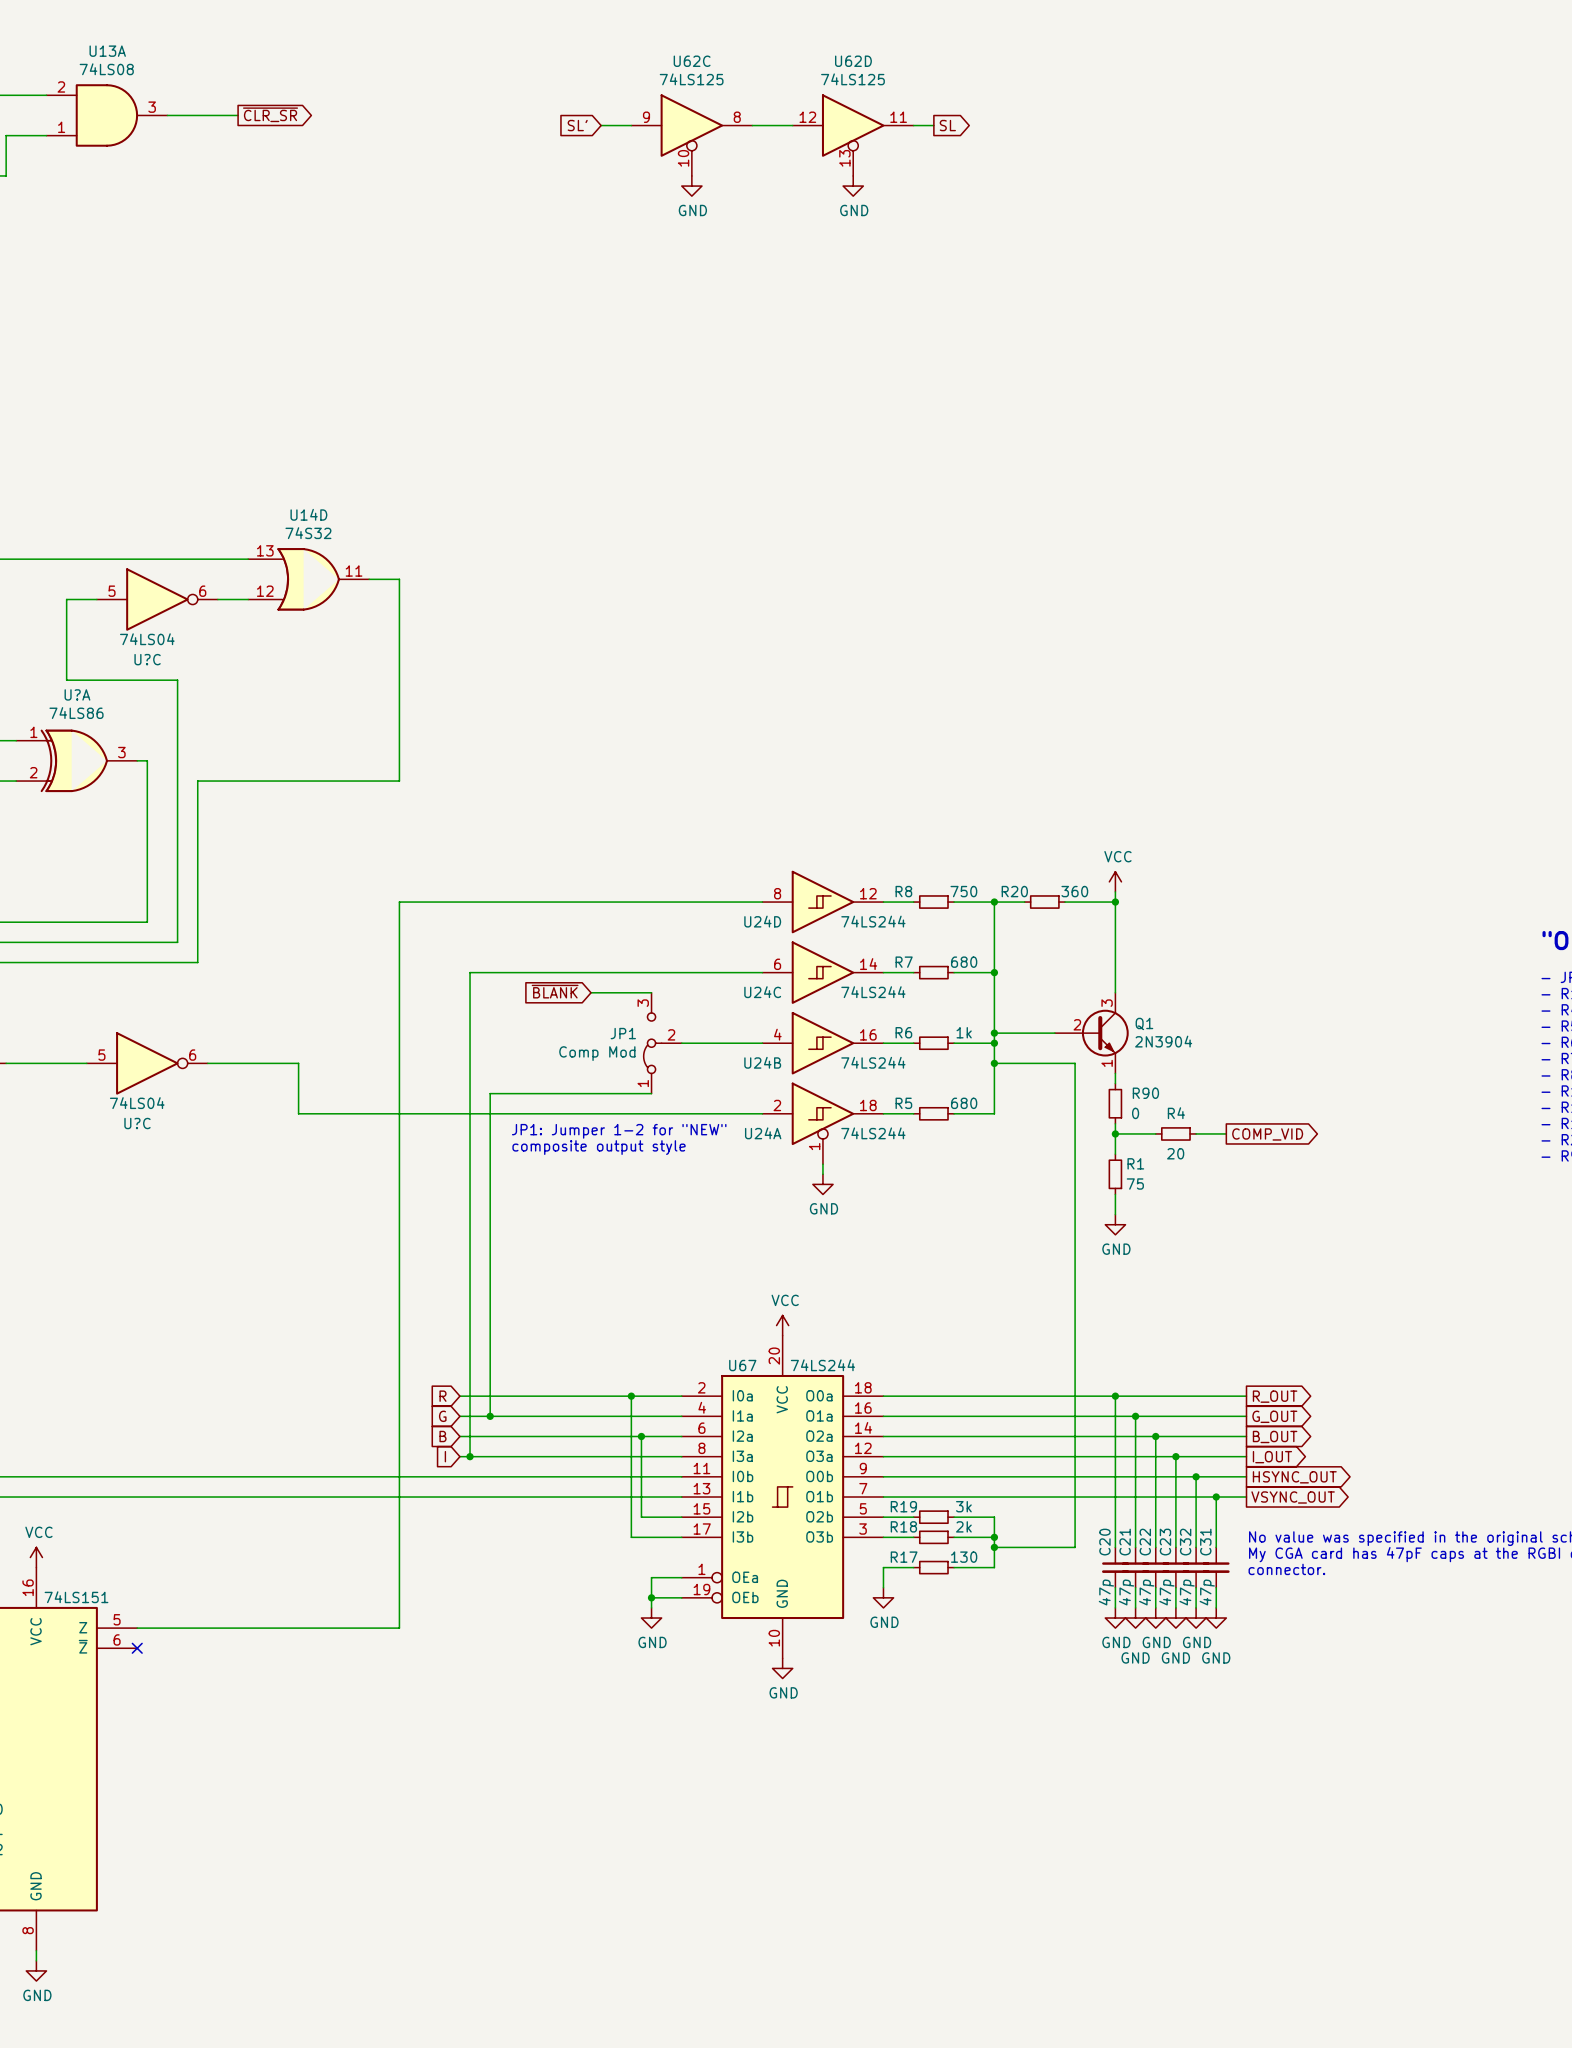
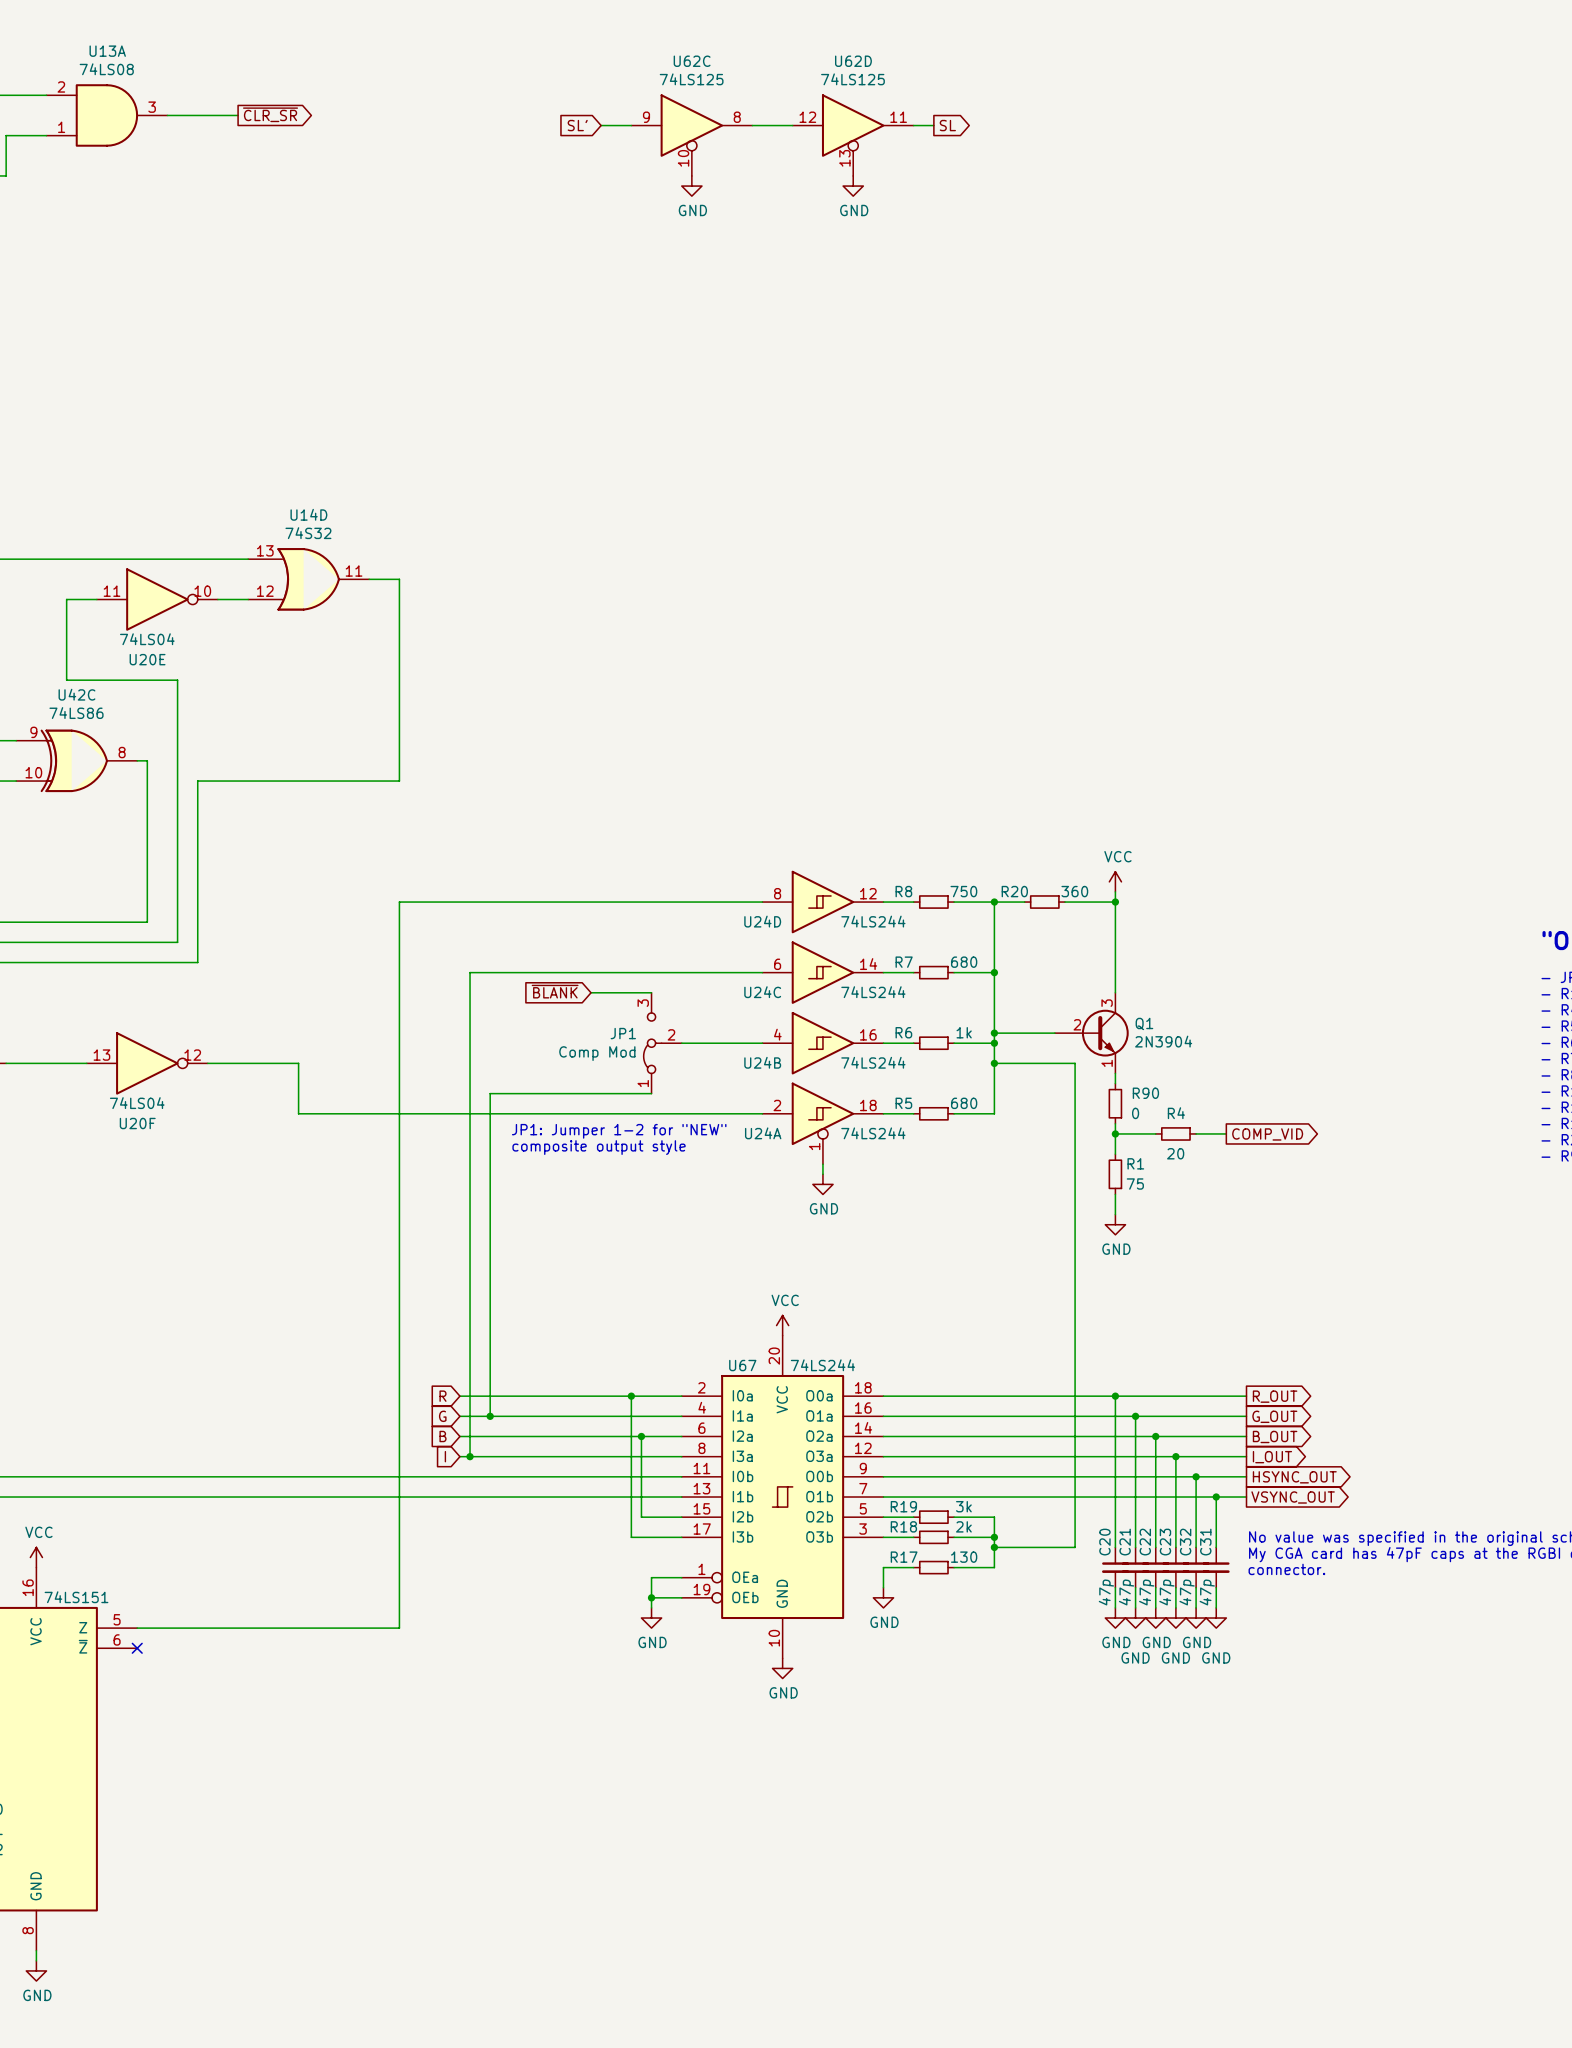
U?C pin number: 5 (112, 591) -> 11 (112, 591)
U?C pin number: 6 (202, 591) -> 10 (202, 591)
U?C name: U?C (147, 659) -> U20E (147, 659)
U?A name: U?A (77, 694) -> U42C (76, 694)
U?A pin number: 1 (33, 732) -> 9 (33, 732)
U?A pin number: 3 (121, 752) -> 8 (122, 752)
U?A pin number: 2 (33, 772) -> 10 (33, 772)
U?C pin number: 5 (101, 1055) -> 13 (101, 1055)
U?C pin number: 6 (192, 1055) -> 12 (192, 1055)
U?C name: U?C (137, 1123) -> U20F (137, 1123)

